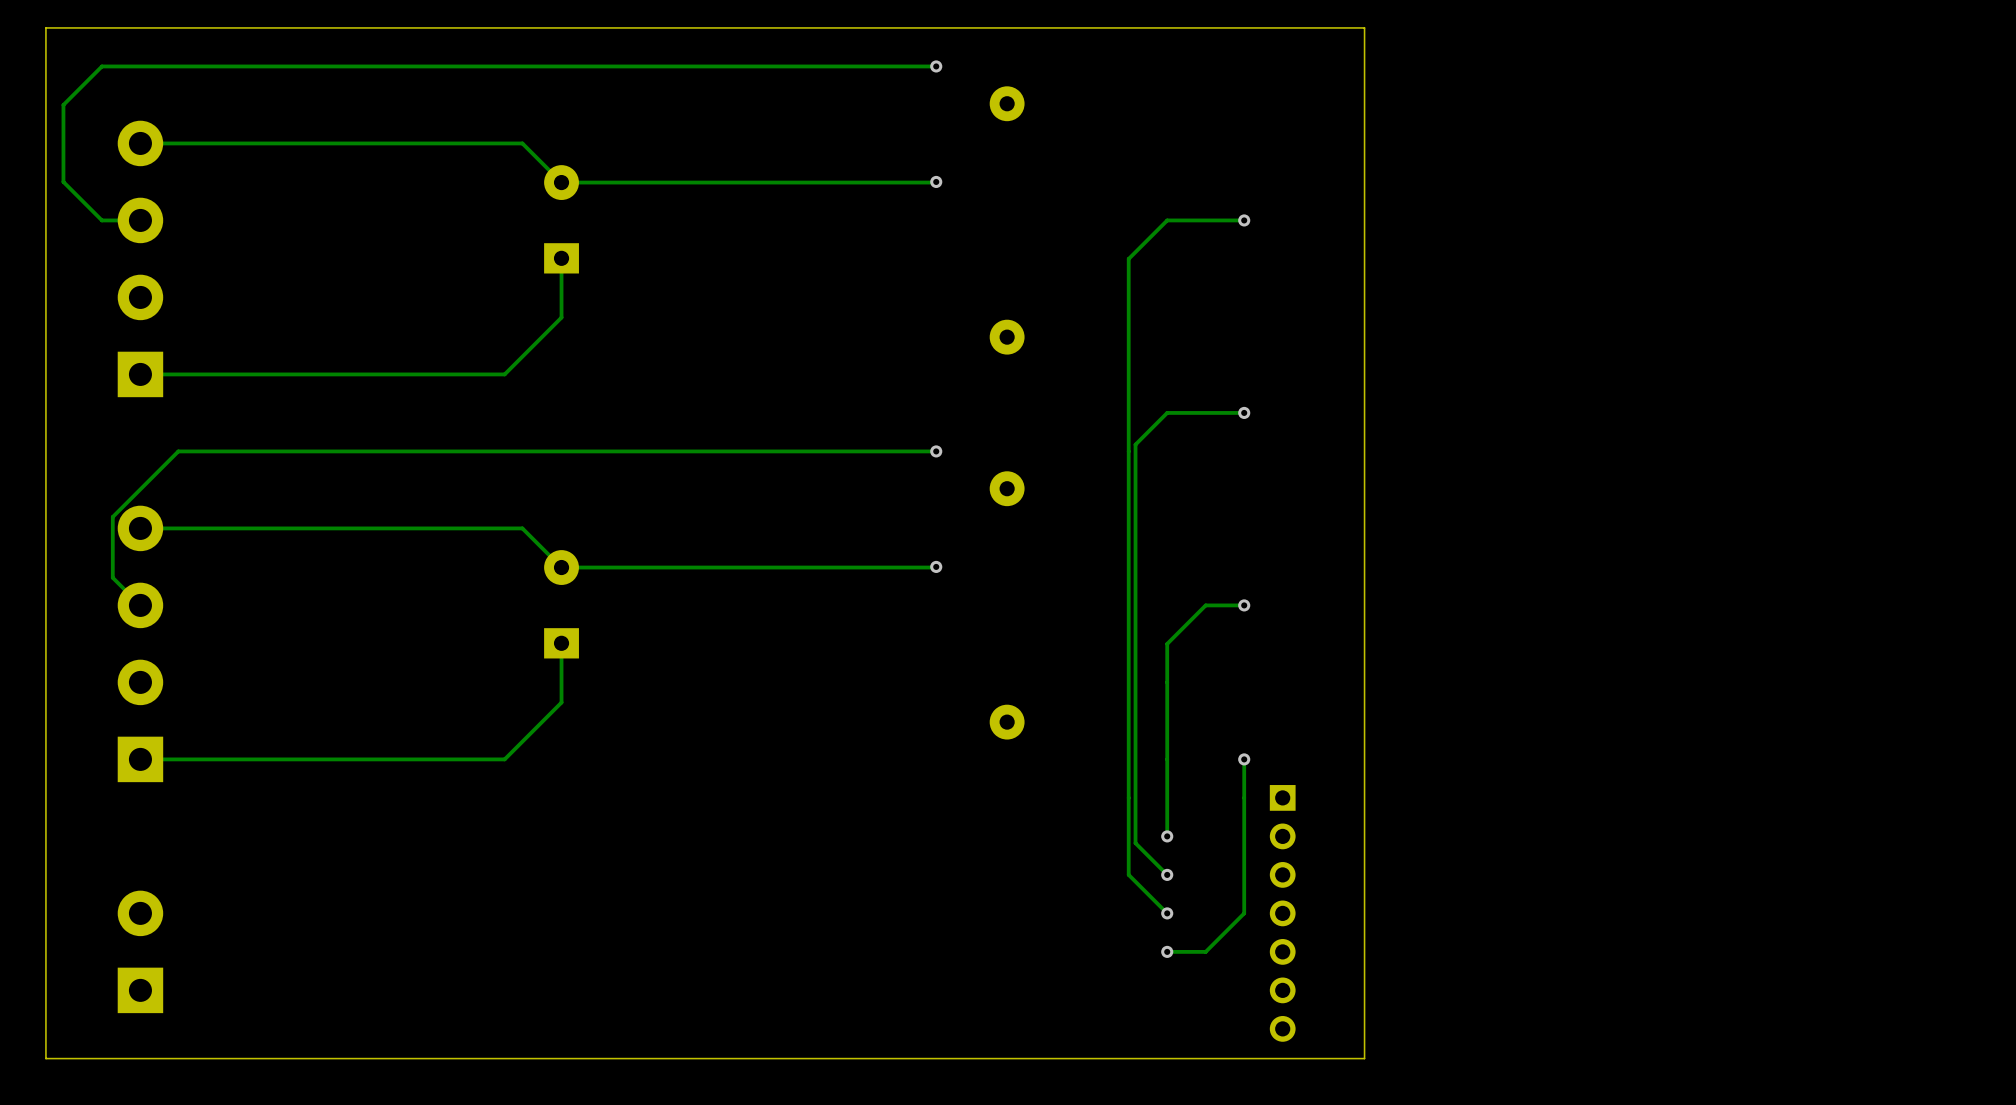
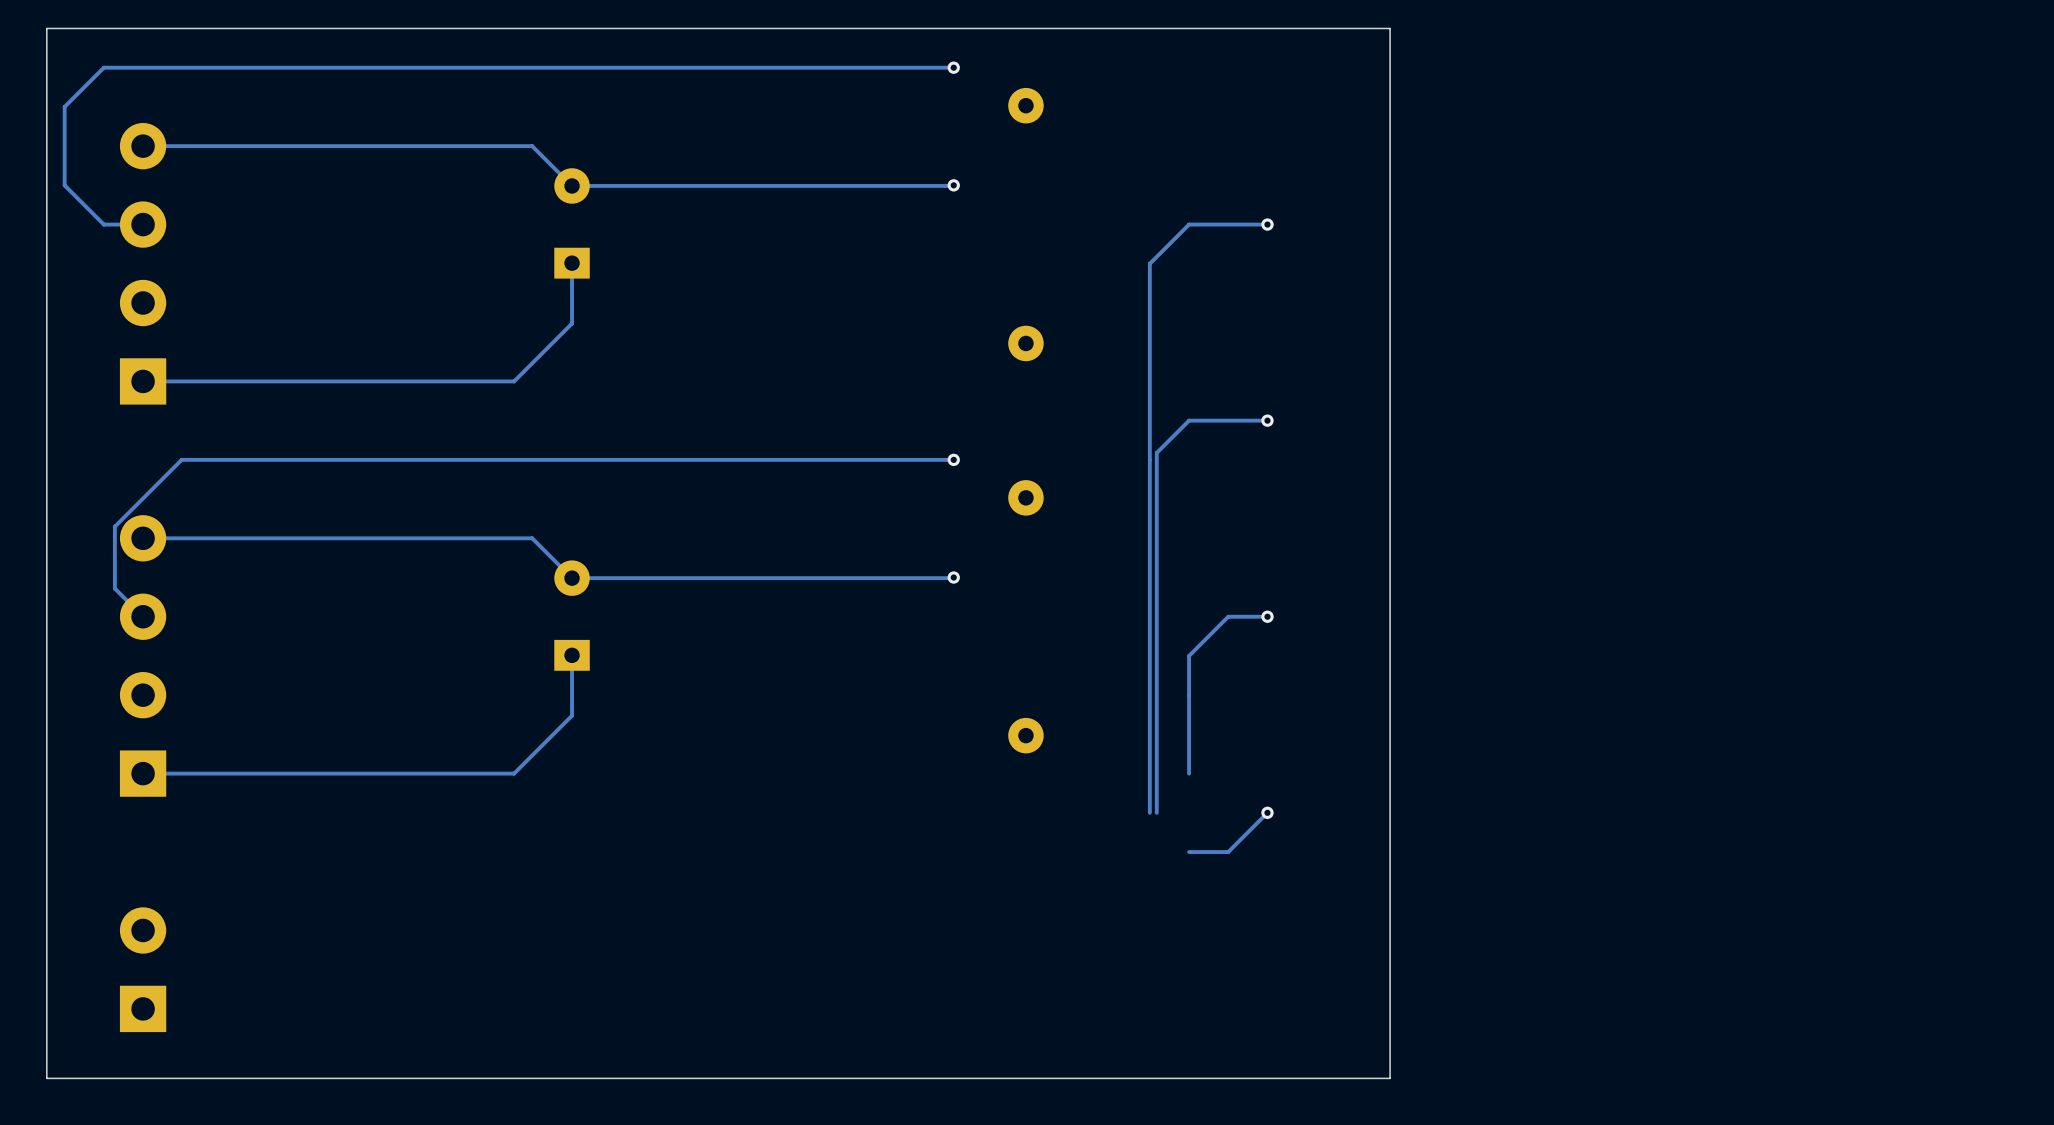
track: (1167, 759) (1167, 836) -> (1267, 812) (1228, 852) (1189, 852)
track: (1244, 759) (1244, 913) (1205, 951) (1167, 951) -> none
via position: (1244, 759) -> (1267, 812)
track: (1128, 797) (1128, 874) (1167, 913) -> none
track: (1135, 797) (1135, 843) (1167, 874) -> none
via: (1167, 836) -> none
via: (1167, 874) -> none
via: (1167, 913) -> none
part: (1282, 913) -> none
via: (1167, 951) -> none

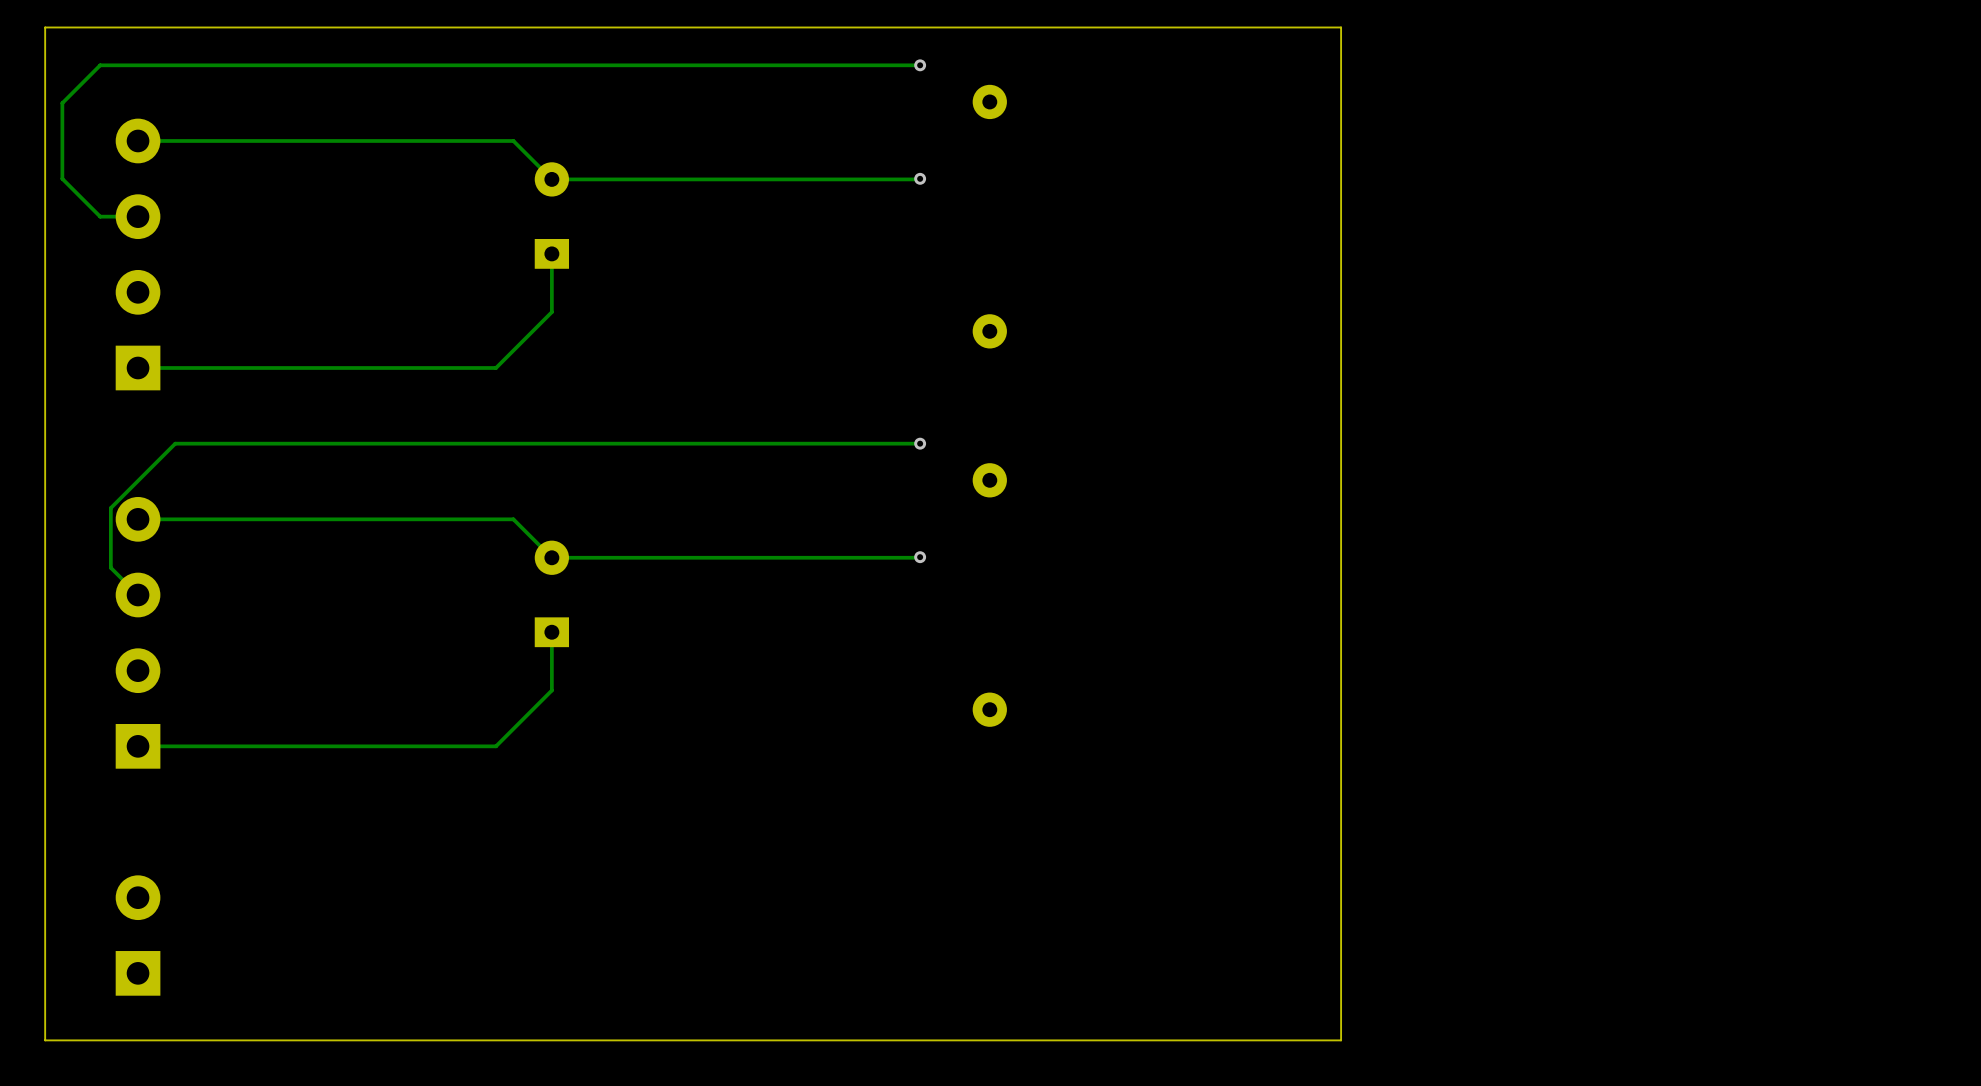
track: (1267, 224) (1189, 224) (1149, 263) (1149, 812) -> none
via: (1267, 224) -> none
track: (1267, 420) (1189, 420) (1156, 452) (1156, 812) -> none
via: (1267, 420) -> none
track: (1267, 616) (1228, 616) (1189, 655) (1189, 773) -> none
via: (1267, 616) -> none
track: (1267, 812) (1228, 852) (1189, 852) -> none
via: (1267, 812) -> none

